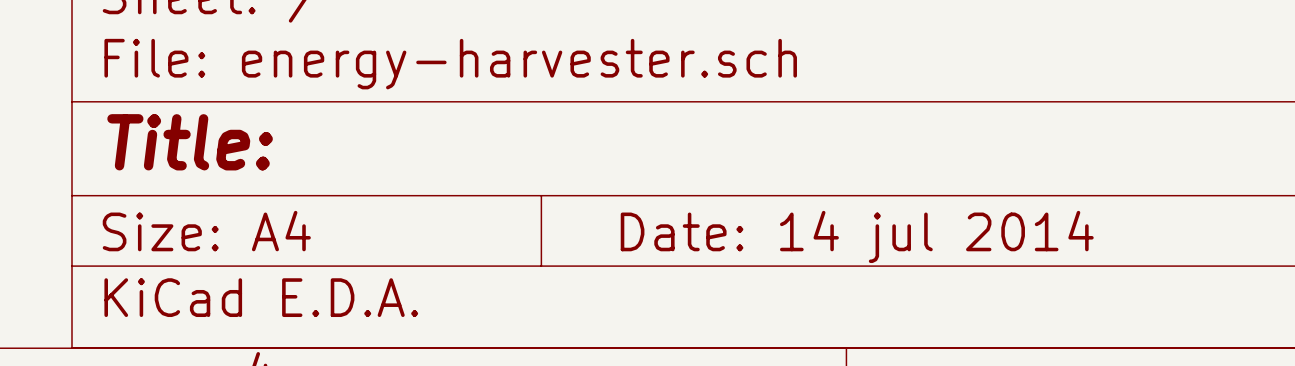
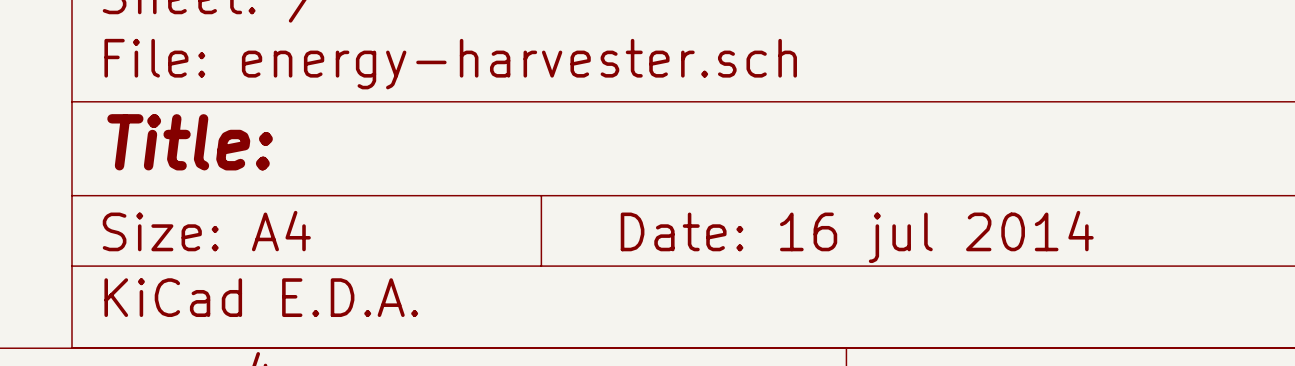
title block: Date: 14 jul 2014 (857, 236) -> Date: 16 jul 2014 (857, 236)

